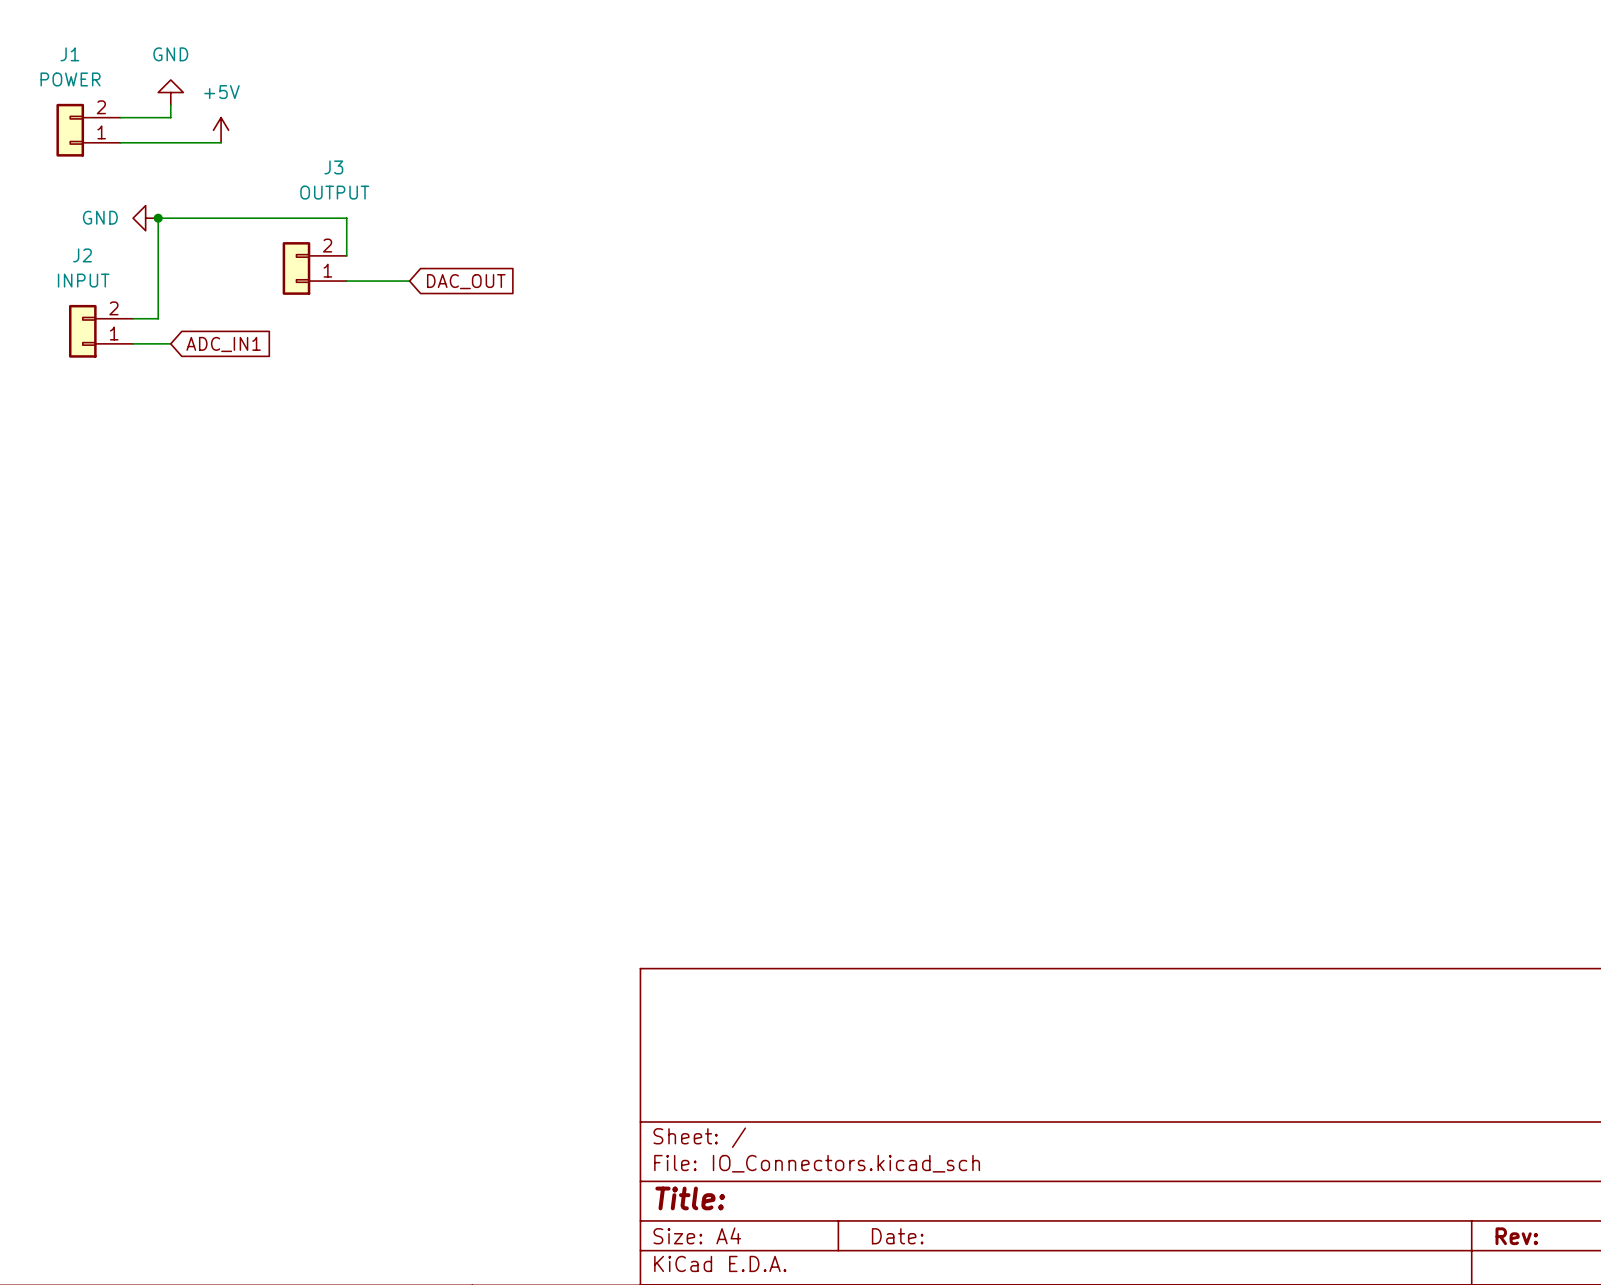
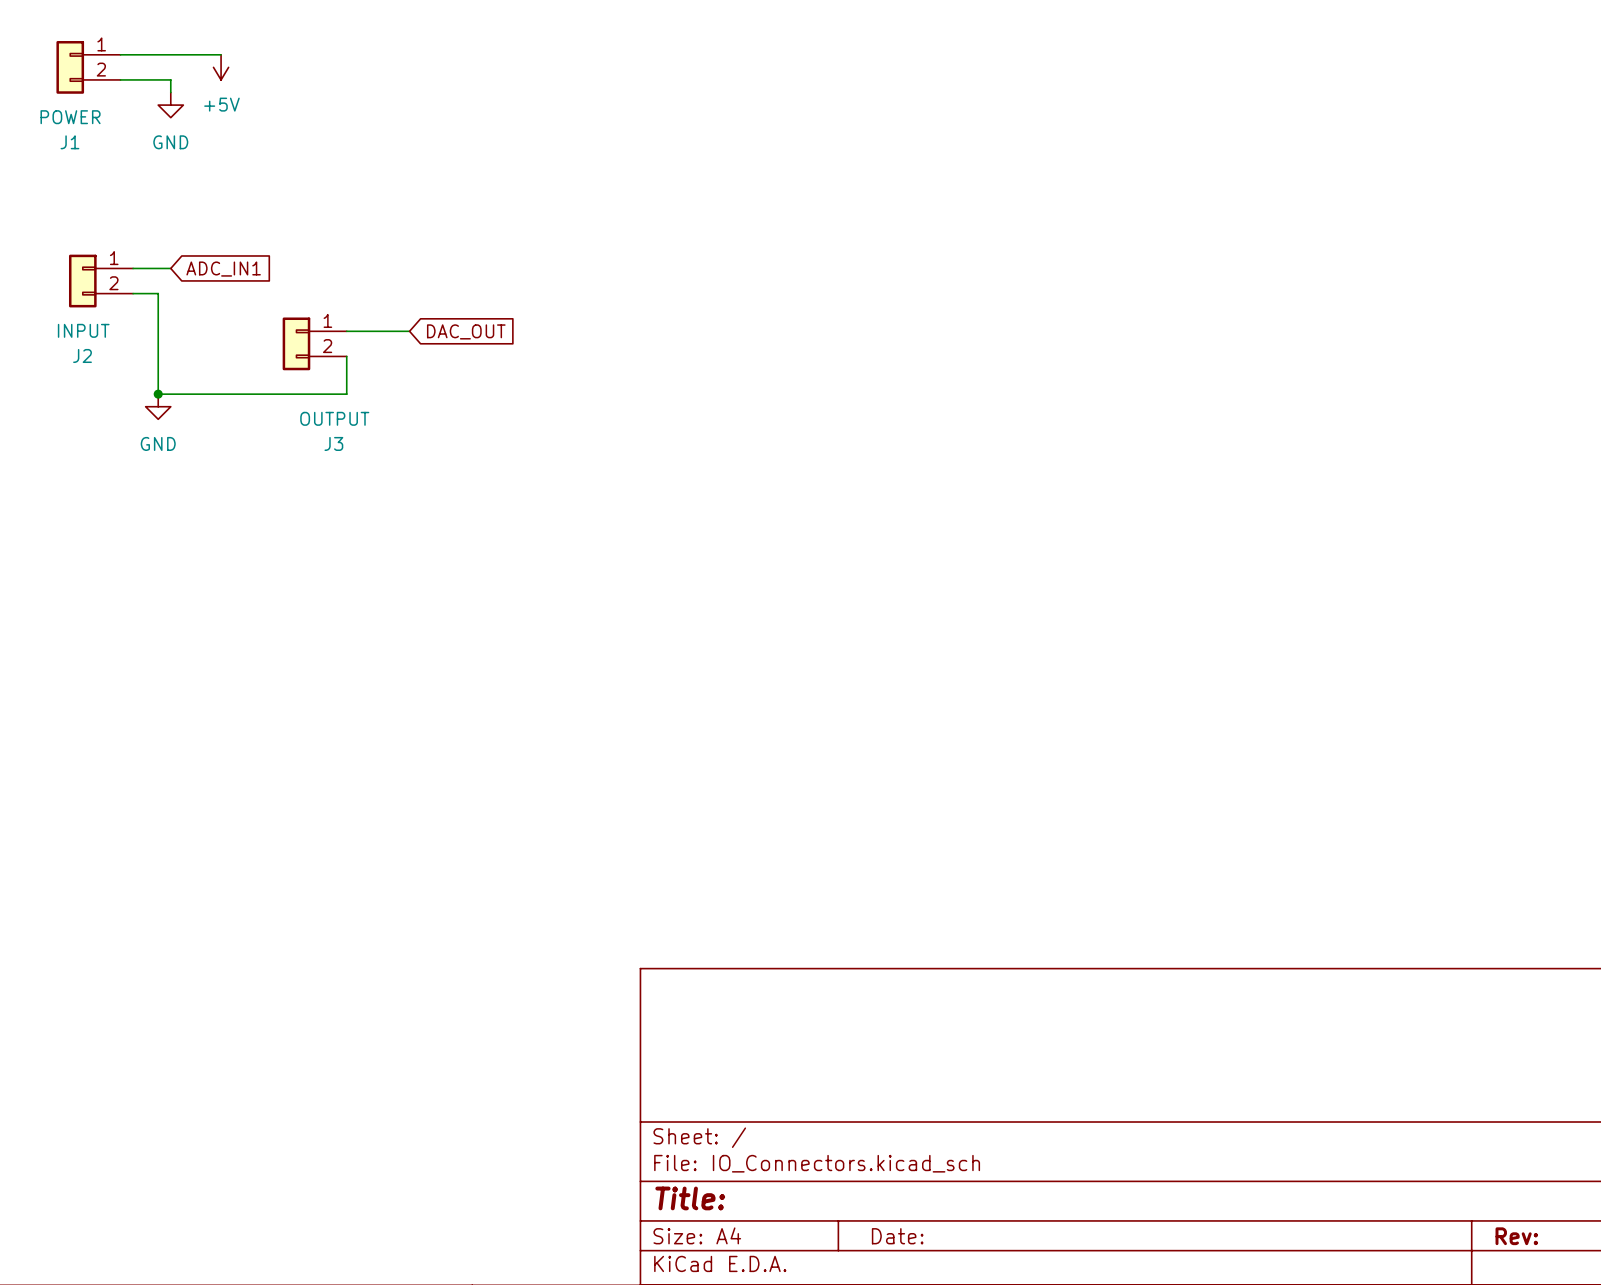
wire: none -> (120, 79) (170, 79) (170, 92)
power symbol rotation: 0° (170, 92) -> 180° (170, 105)
wire: (170, 105) (170, 117) (120, 117) -> none
J1 flip: as is (70, 130) -> up-down (70, 67)
J1 position: (88, 130) -> (88, 67)
power symbol rotation: 0° (221, 130) -> 180° (221, 67)
power symbol position: +5V (221, 130) -> +5V (221, 67)
wire: (120, 142) (221, 142) -> (120, 54) (221, 54)
power symbol: GND (145, 218) -> none
junction: (158, 218) -> none
wire: (346, 255) (346, 218) (158, 218) (158, 293) -> (133, 293) (158, 293)
J3 flip: as is (296, 268) -> up-down (296, 343)
J3 position: (314, 268) -> (314, 343)
wire: (346, 281) (409, 281) -> (346, 331) (409, 331)
global label position: DAC_OUT (466, 281) -> DAC_OUT (466, 331)
wire: (133, 318) (158, 318) -> (346, 356) (346, 394) (158, 394) (158, 318)
J2 flip: as is (82, 331) -> up-down (82, 281)
J2 position: (101, 331) -> (101, 281)
wire: (133, 343) (170, 343) -> (133, 268) (170, 268)
global label position: ADC_IN1 (223, 344) -> ADC_IN1 (223, 269)
junction: none -> (158, 394)
power symbol: none -> GND (158, 406)

